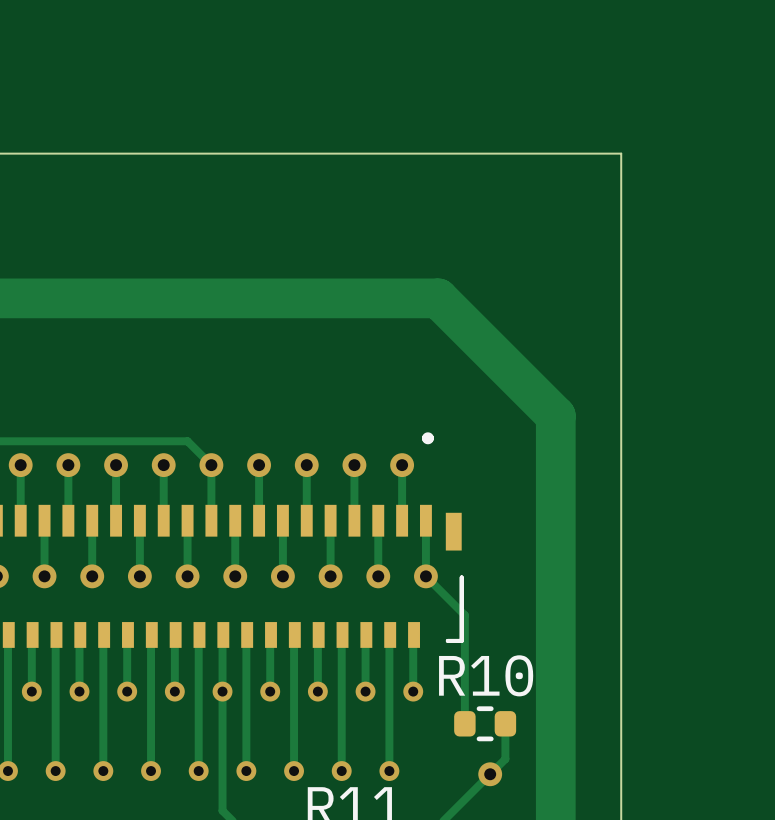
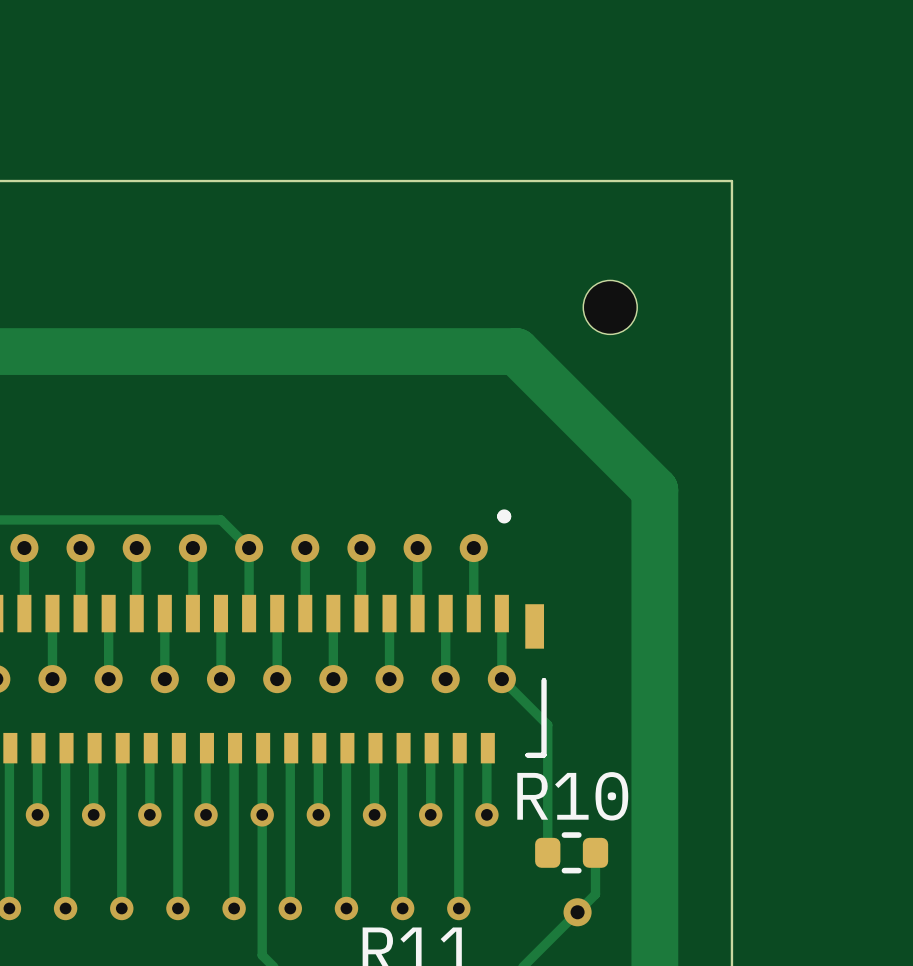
part: none -> (610, 307)

